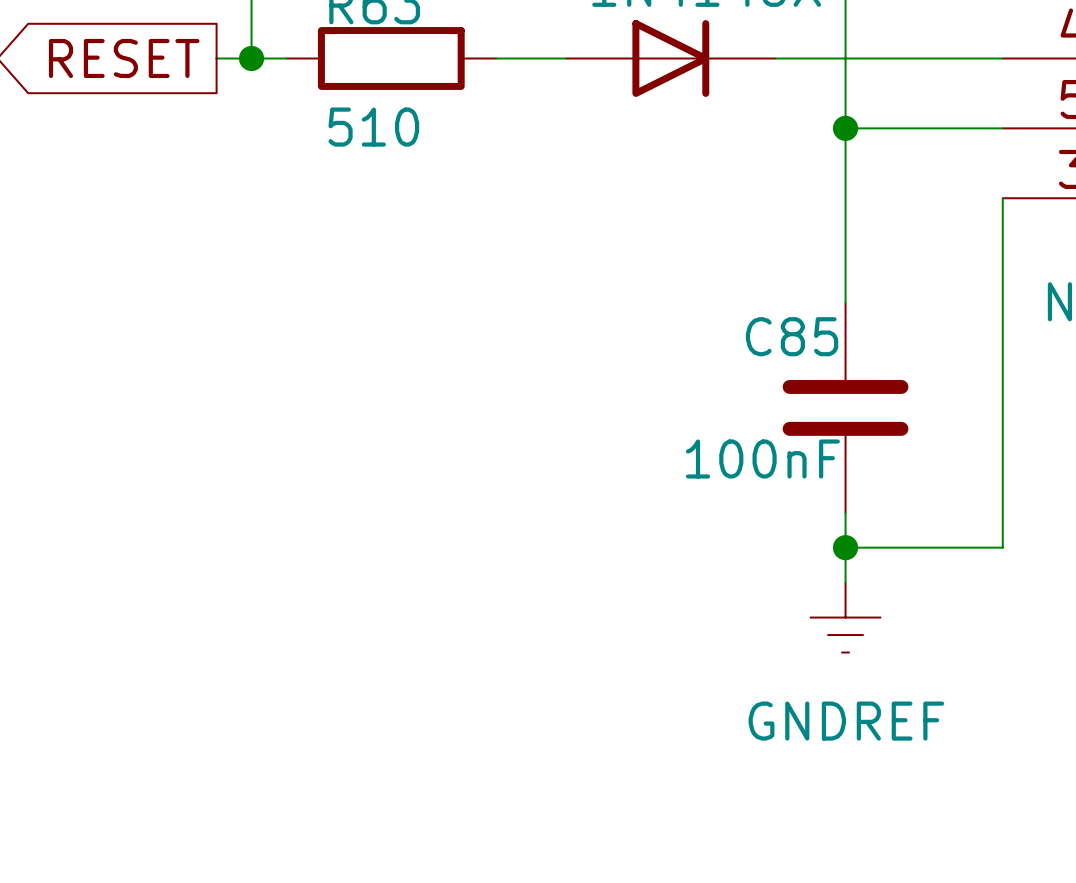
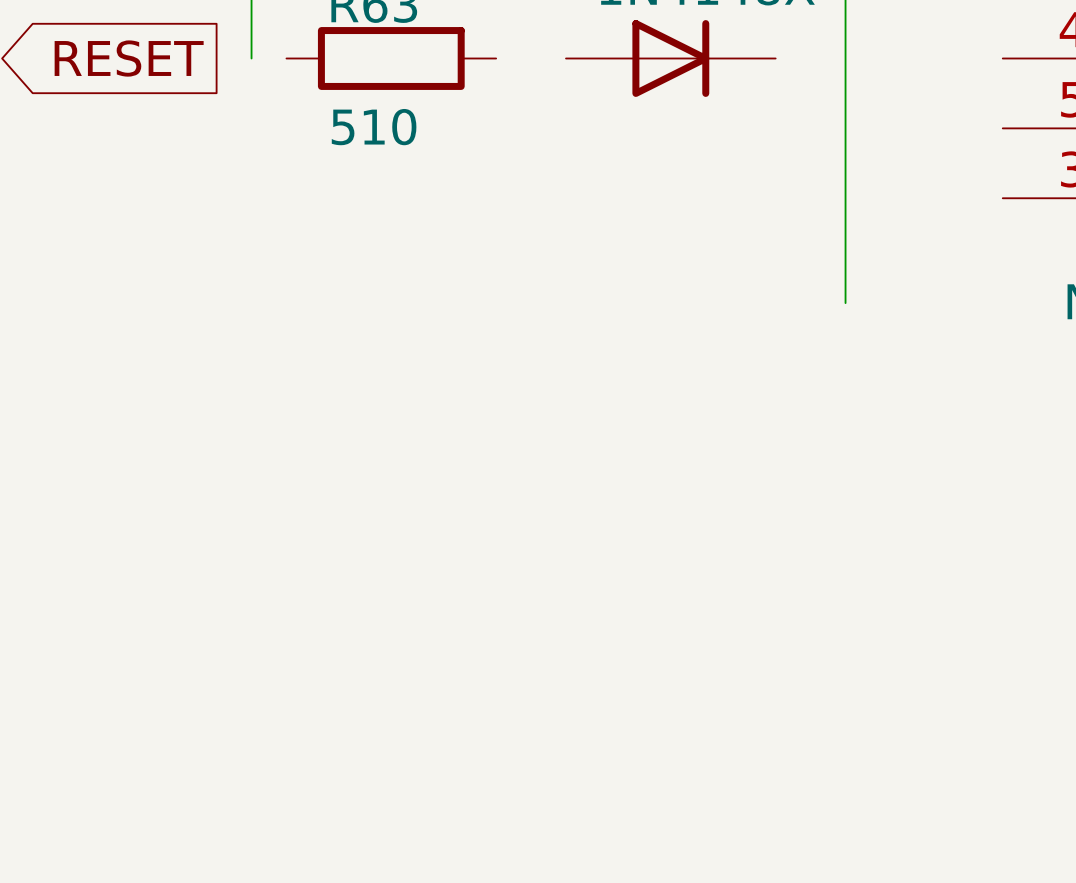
wire: (216, 58) (286, 58) -> none
junction: (251, 58) -> none
wire: (496, 58) (566, 58) -> none
wire: (775, 58) (1002, 58) -> none
wire: (845, 128) (1002, 128) -> none
junction: (845, 128) -> none
wire: (1002, 198) (1002, 547) (845, 547) -> none
C85: 100nF (845, 407) -> none
wire: (845, 512) (845, 582) -> none
junction: (845, 547) -> none
power symbol: GNDREF (845, 617) -> none

